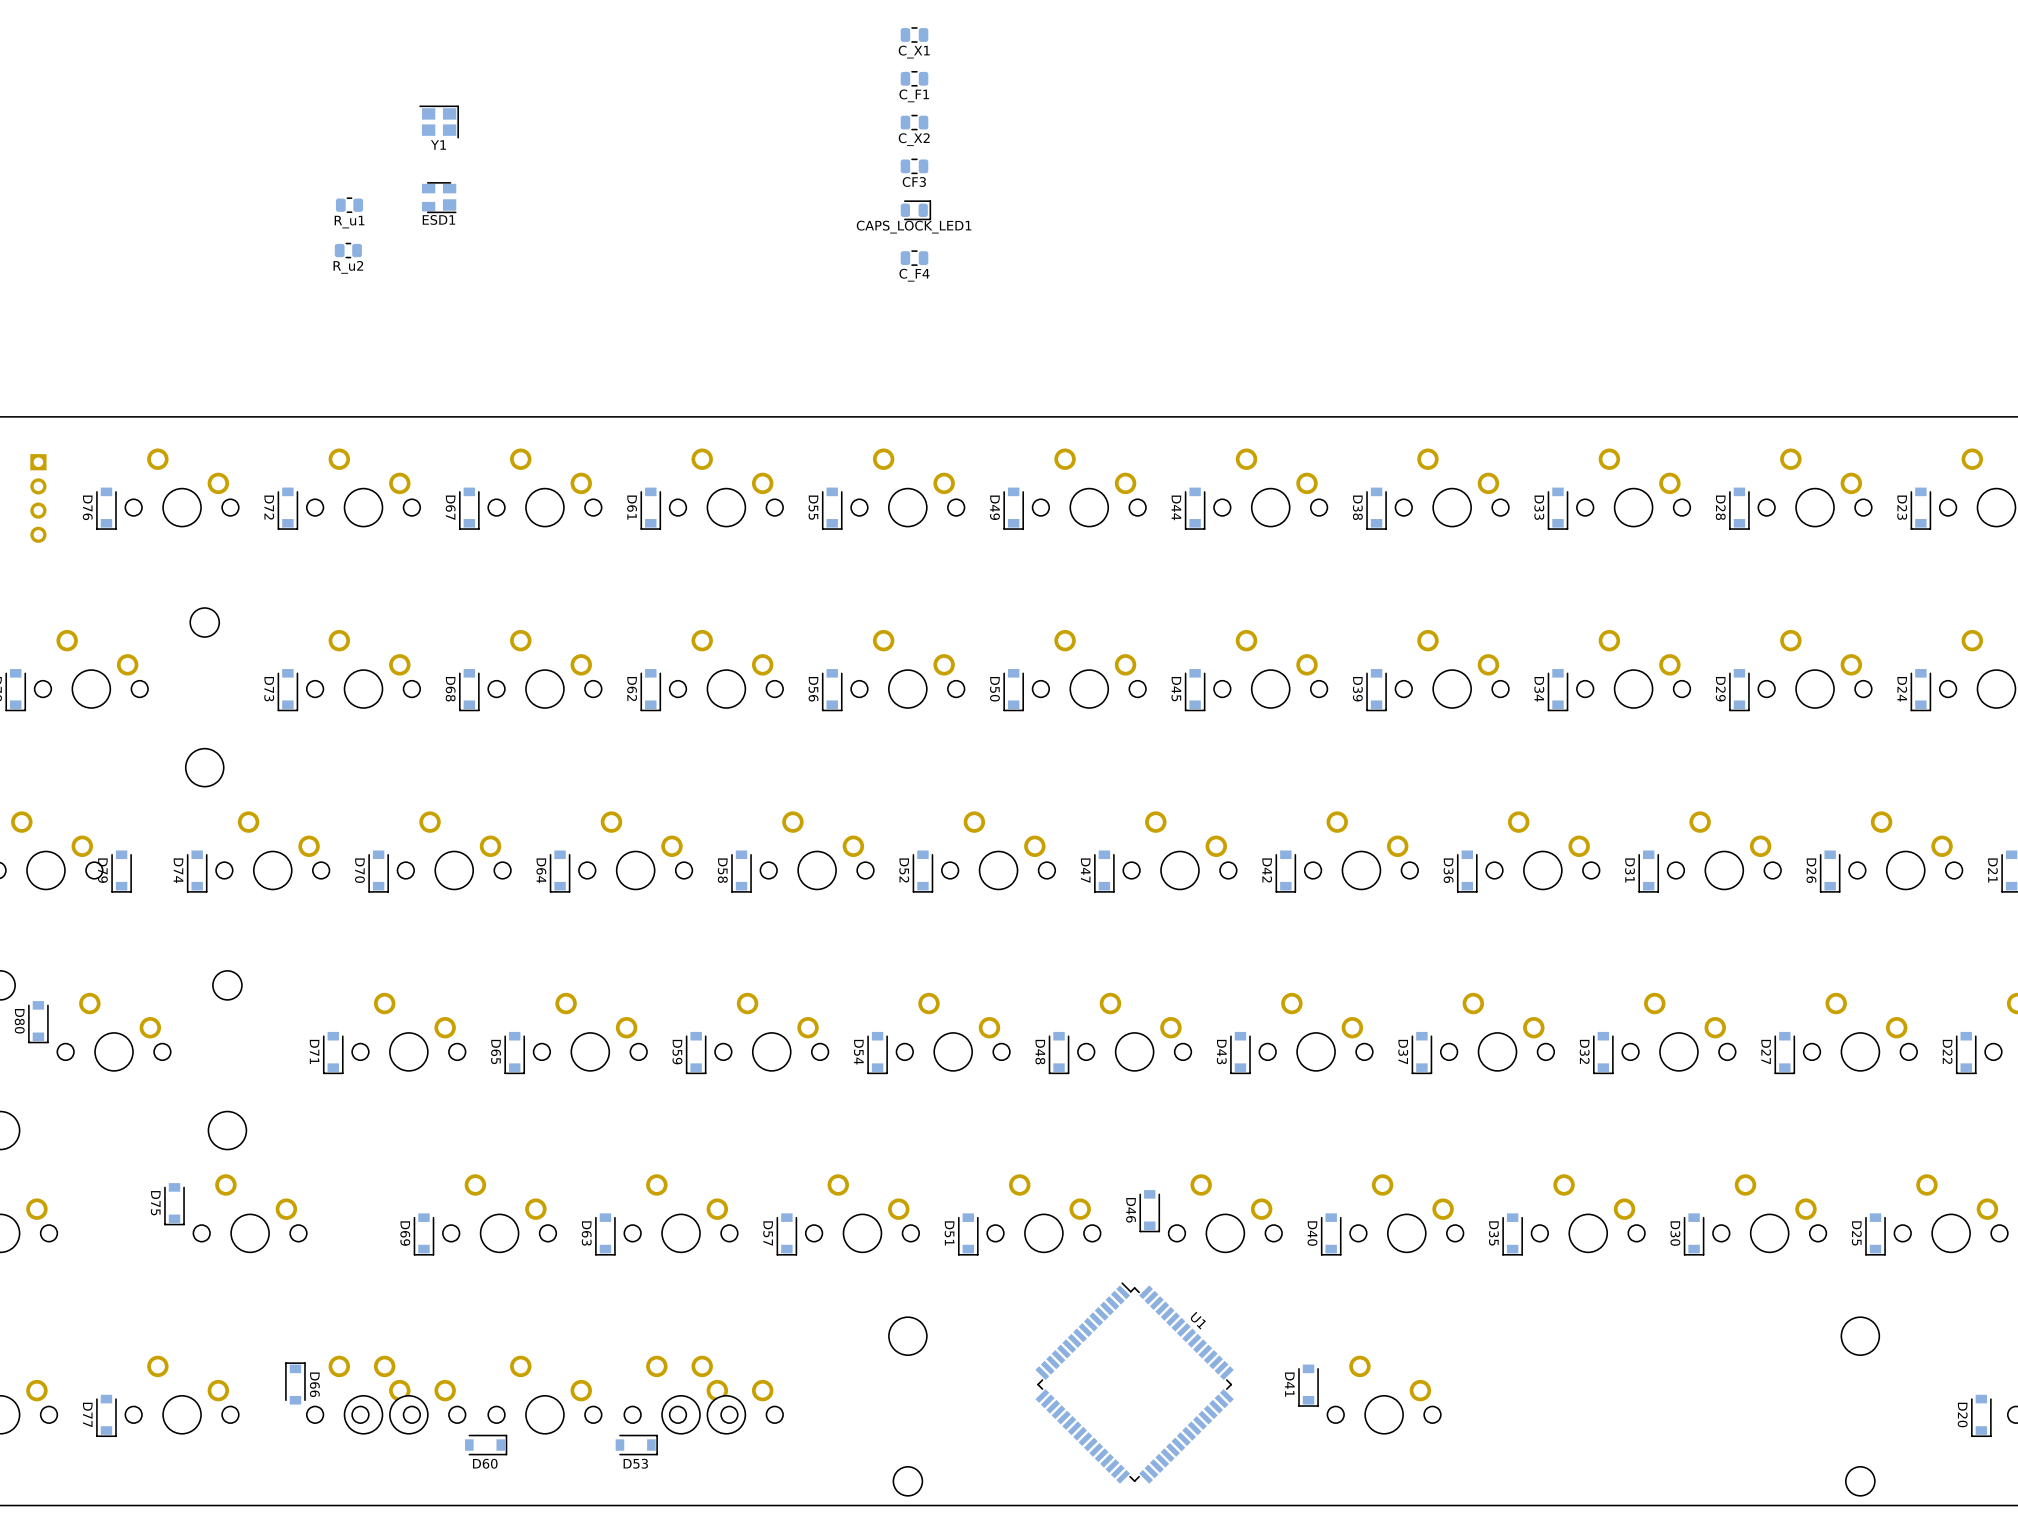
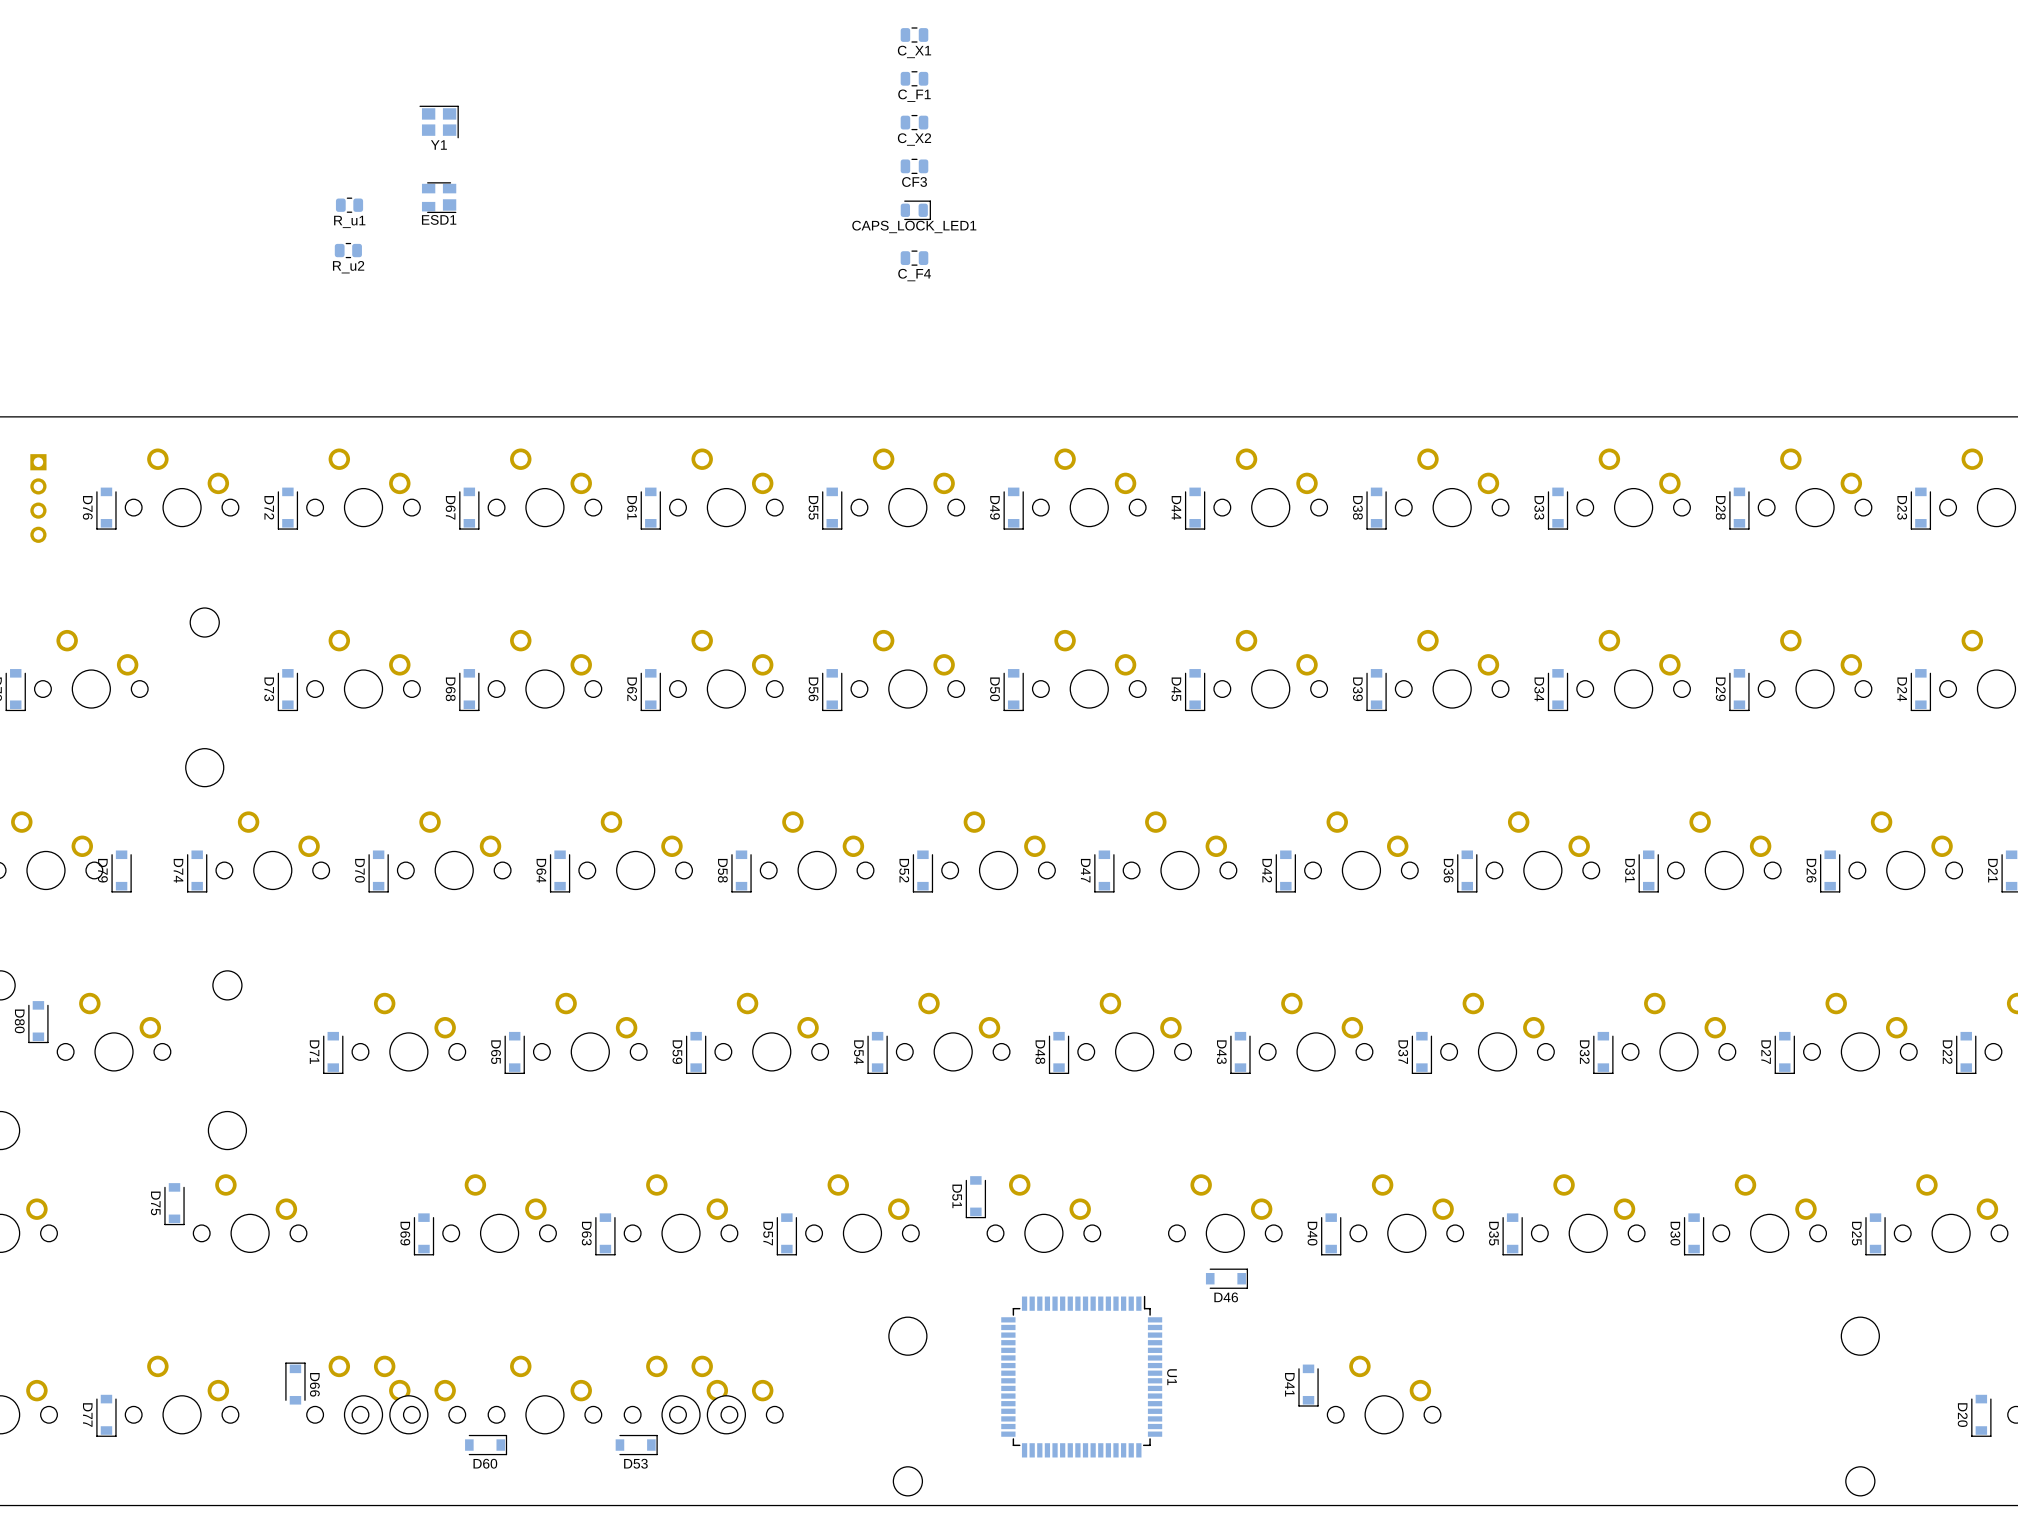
D46 rotation: 0° (1149, 1211) -> 90° counterclockwise (1226, 1278)
D46 position: (1149, 1211) -> (1226, 1278)
D51 position: (968, 1234) -> (975, 1197)
U1 rotation: 0° (1134, 1383) -> 45° clockwise (1081, 1376)

